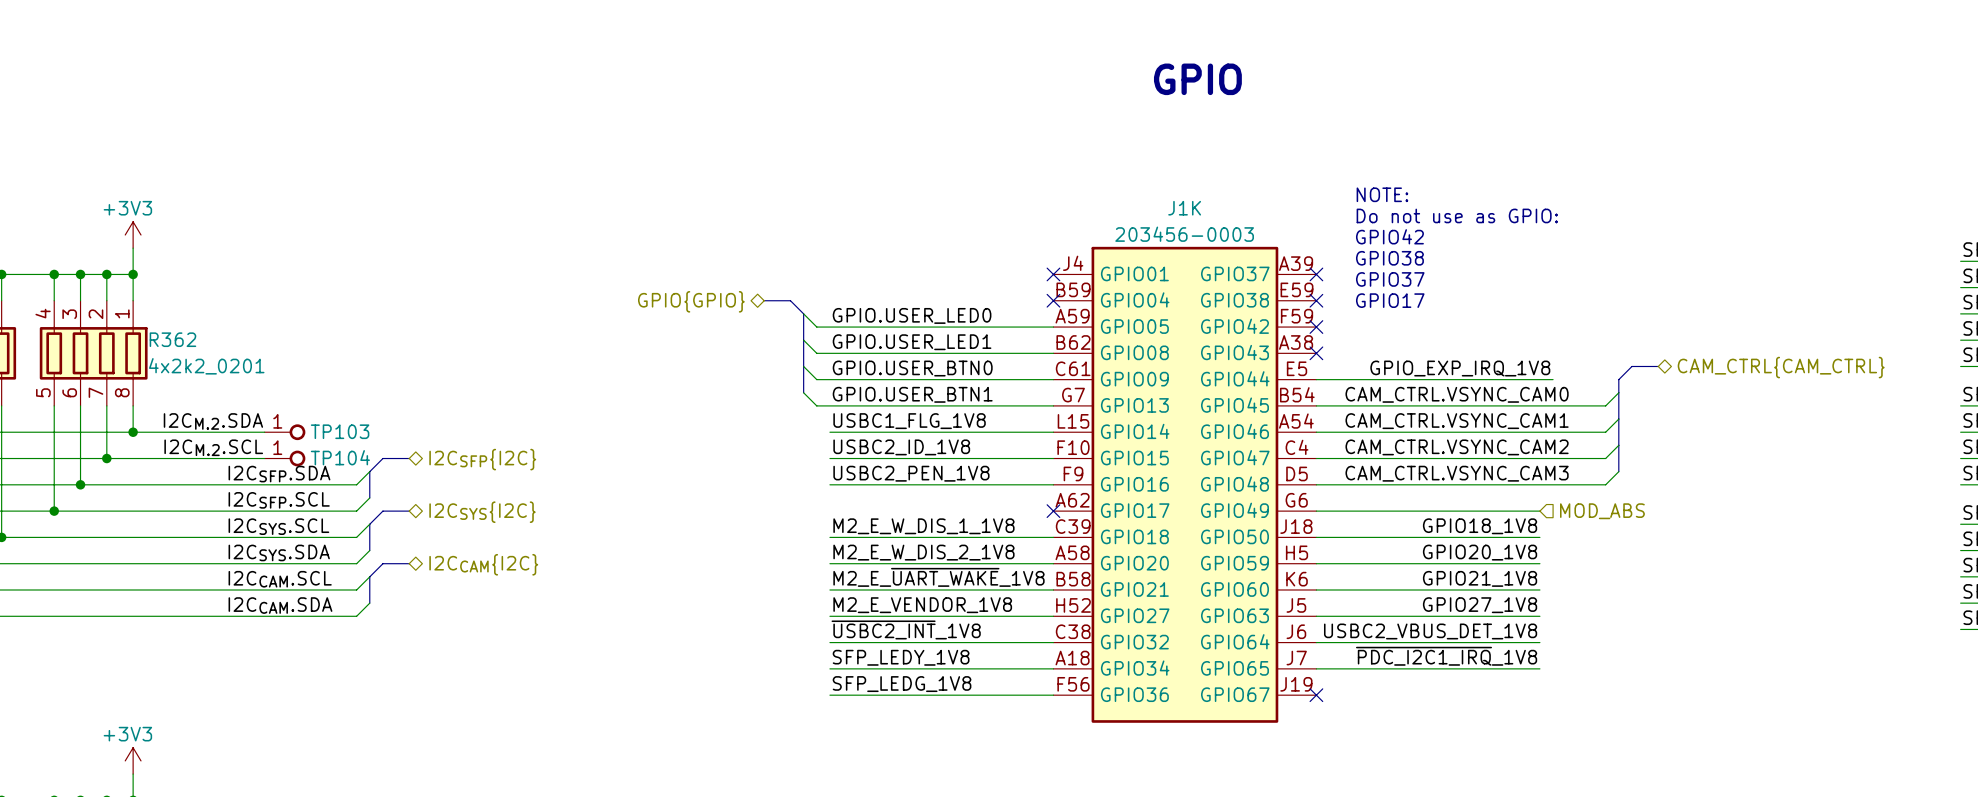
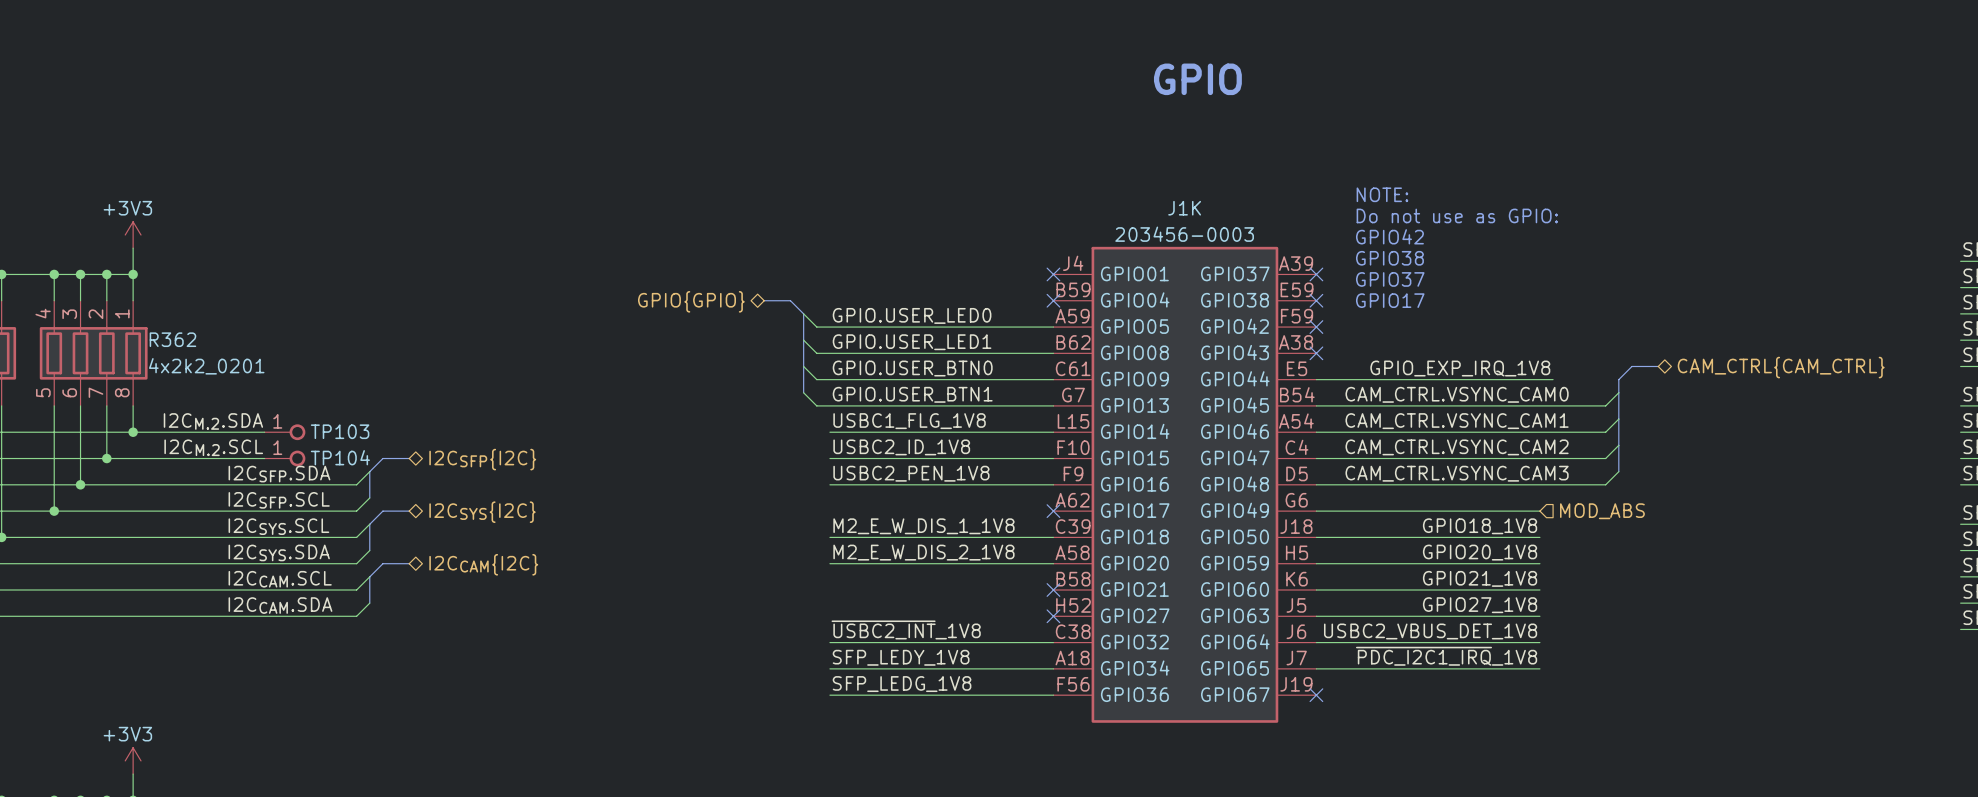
label: M2_E_~{UART_WAKE}_1V8 (938, 577) -> none
wire: (829, 589) (1053, 589) -> none
no-connect mark: none -> (1053, 589)
label: M2_E_VENDOR_1V8 (922, 605) -> none
wire: (829, 616) (1053, 616) -> none
no-connect mark: none -> (1053, 616)

